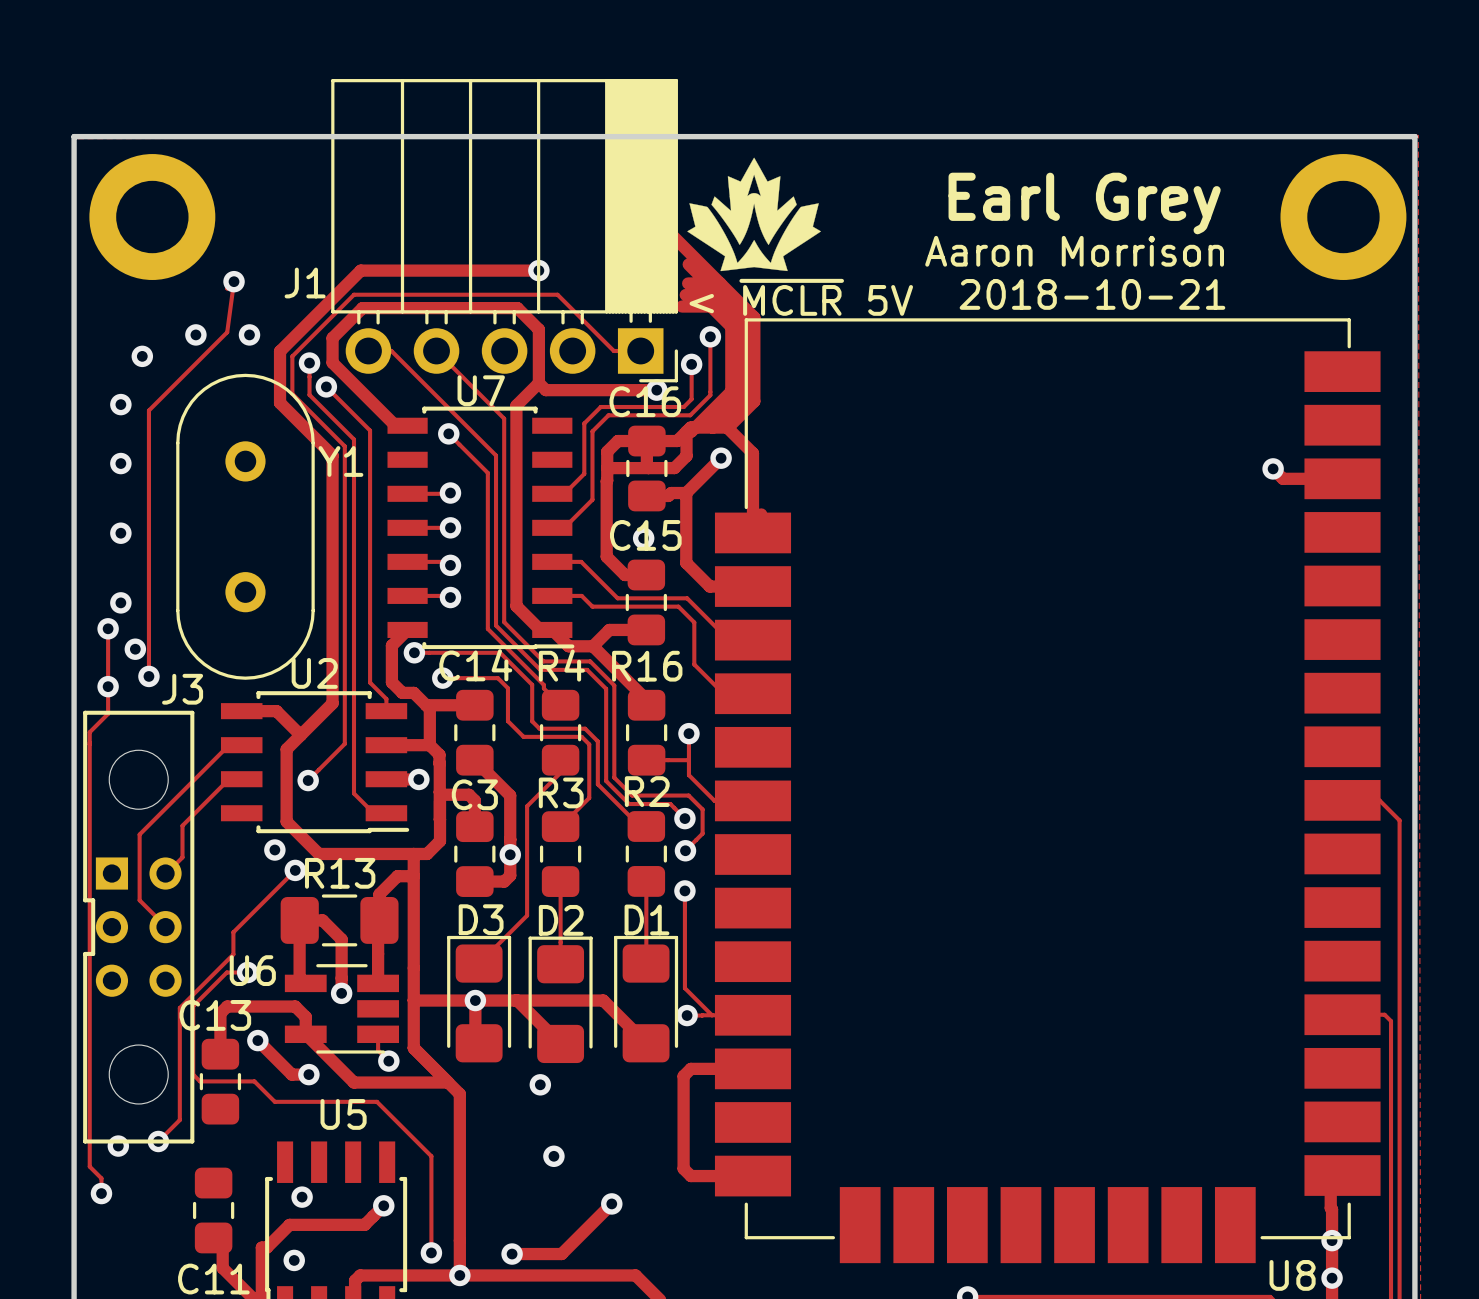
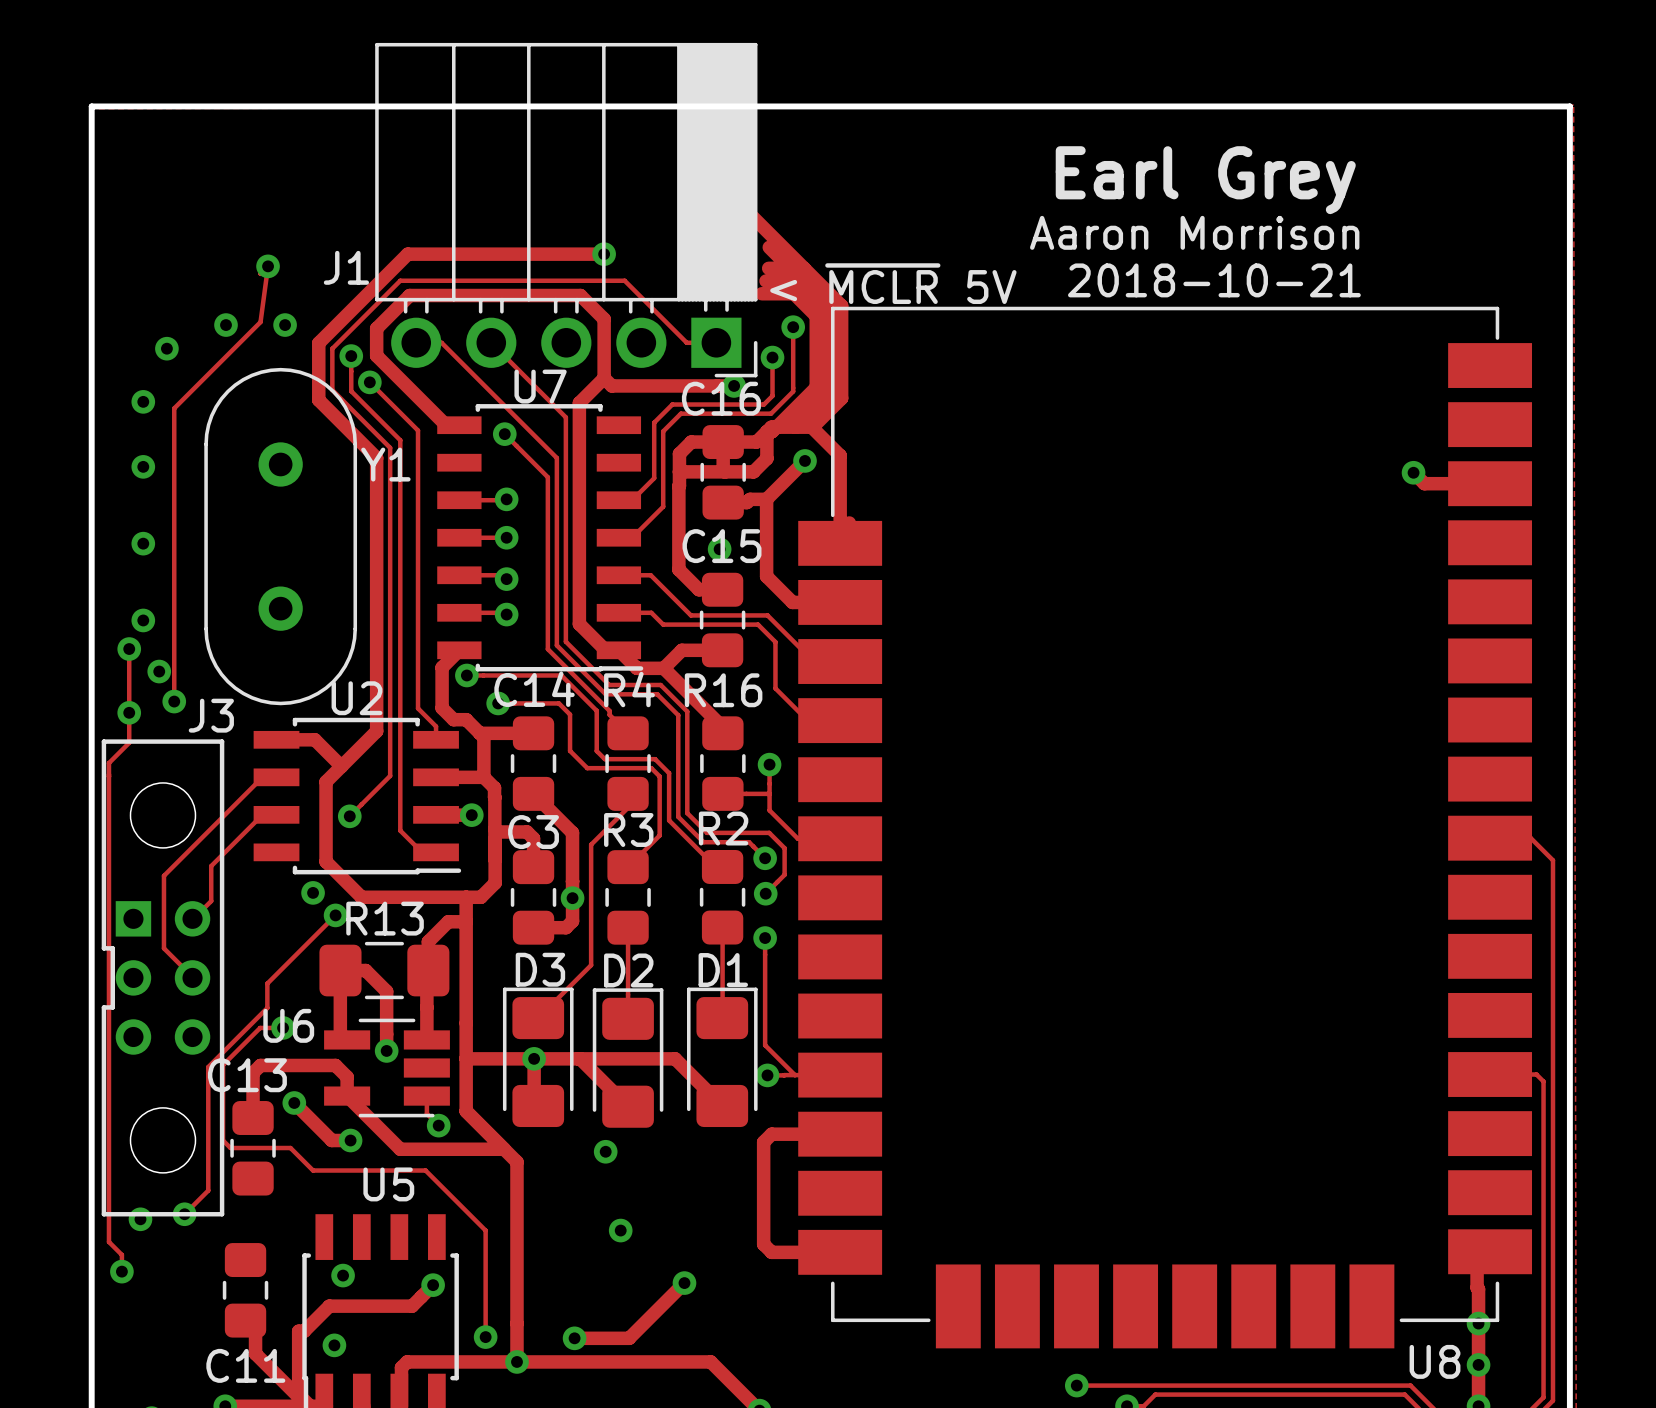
drawing: [687, 157, 821, 272] -> none
part: (152, 217) -> none
part: (1343, 217) -> none

